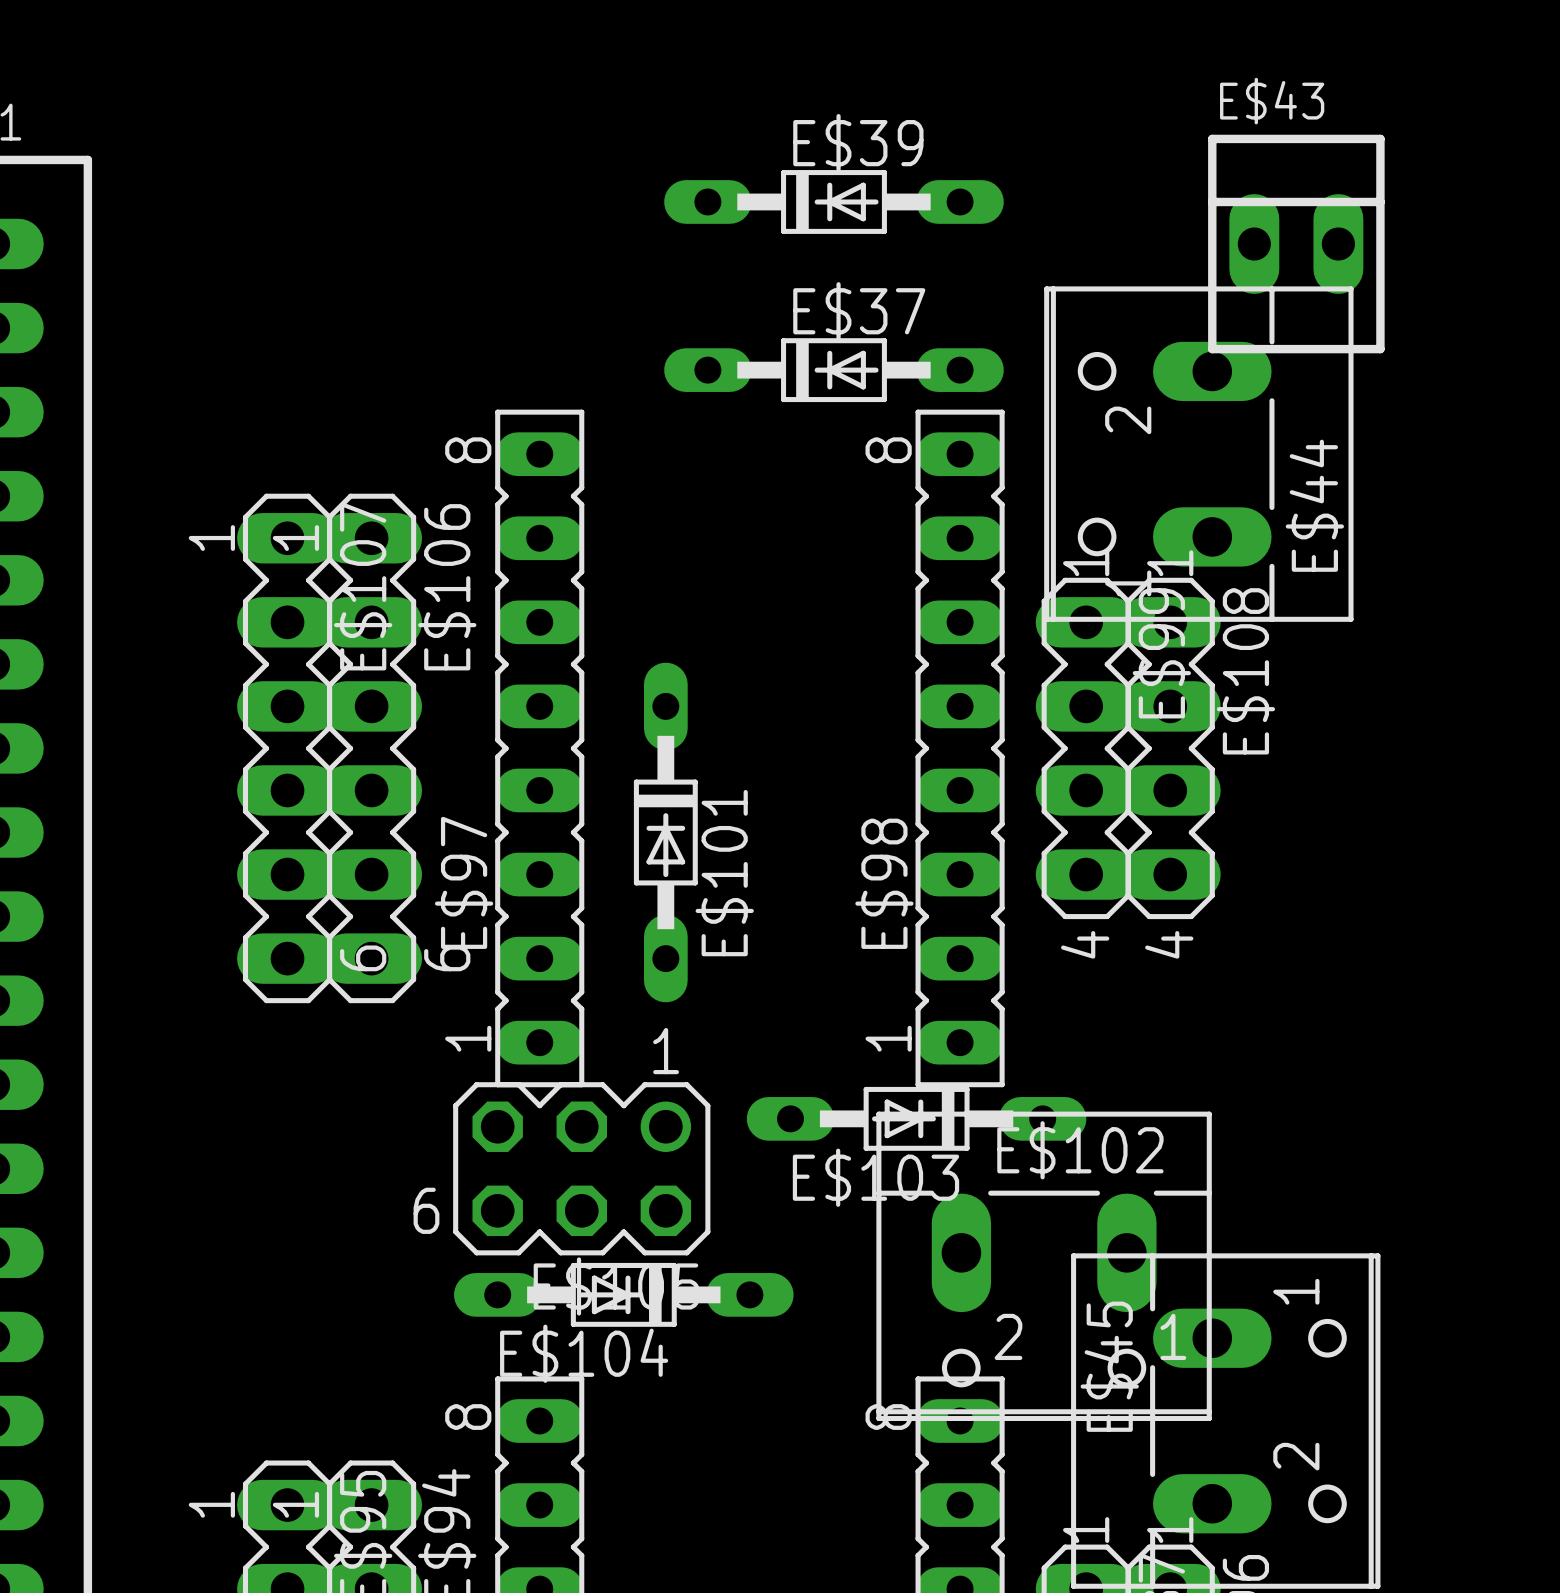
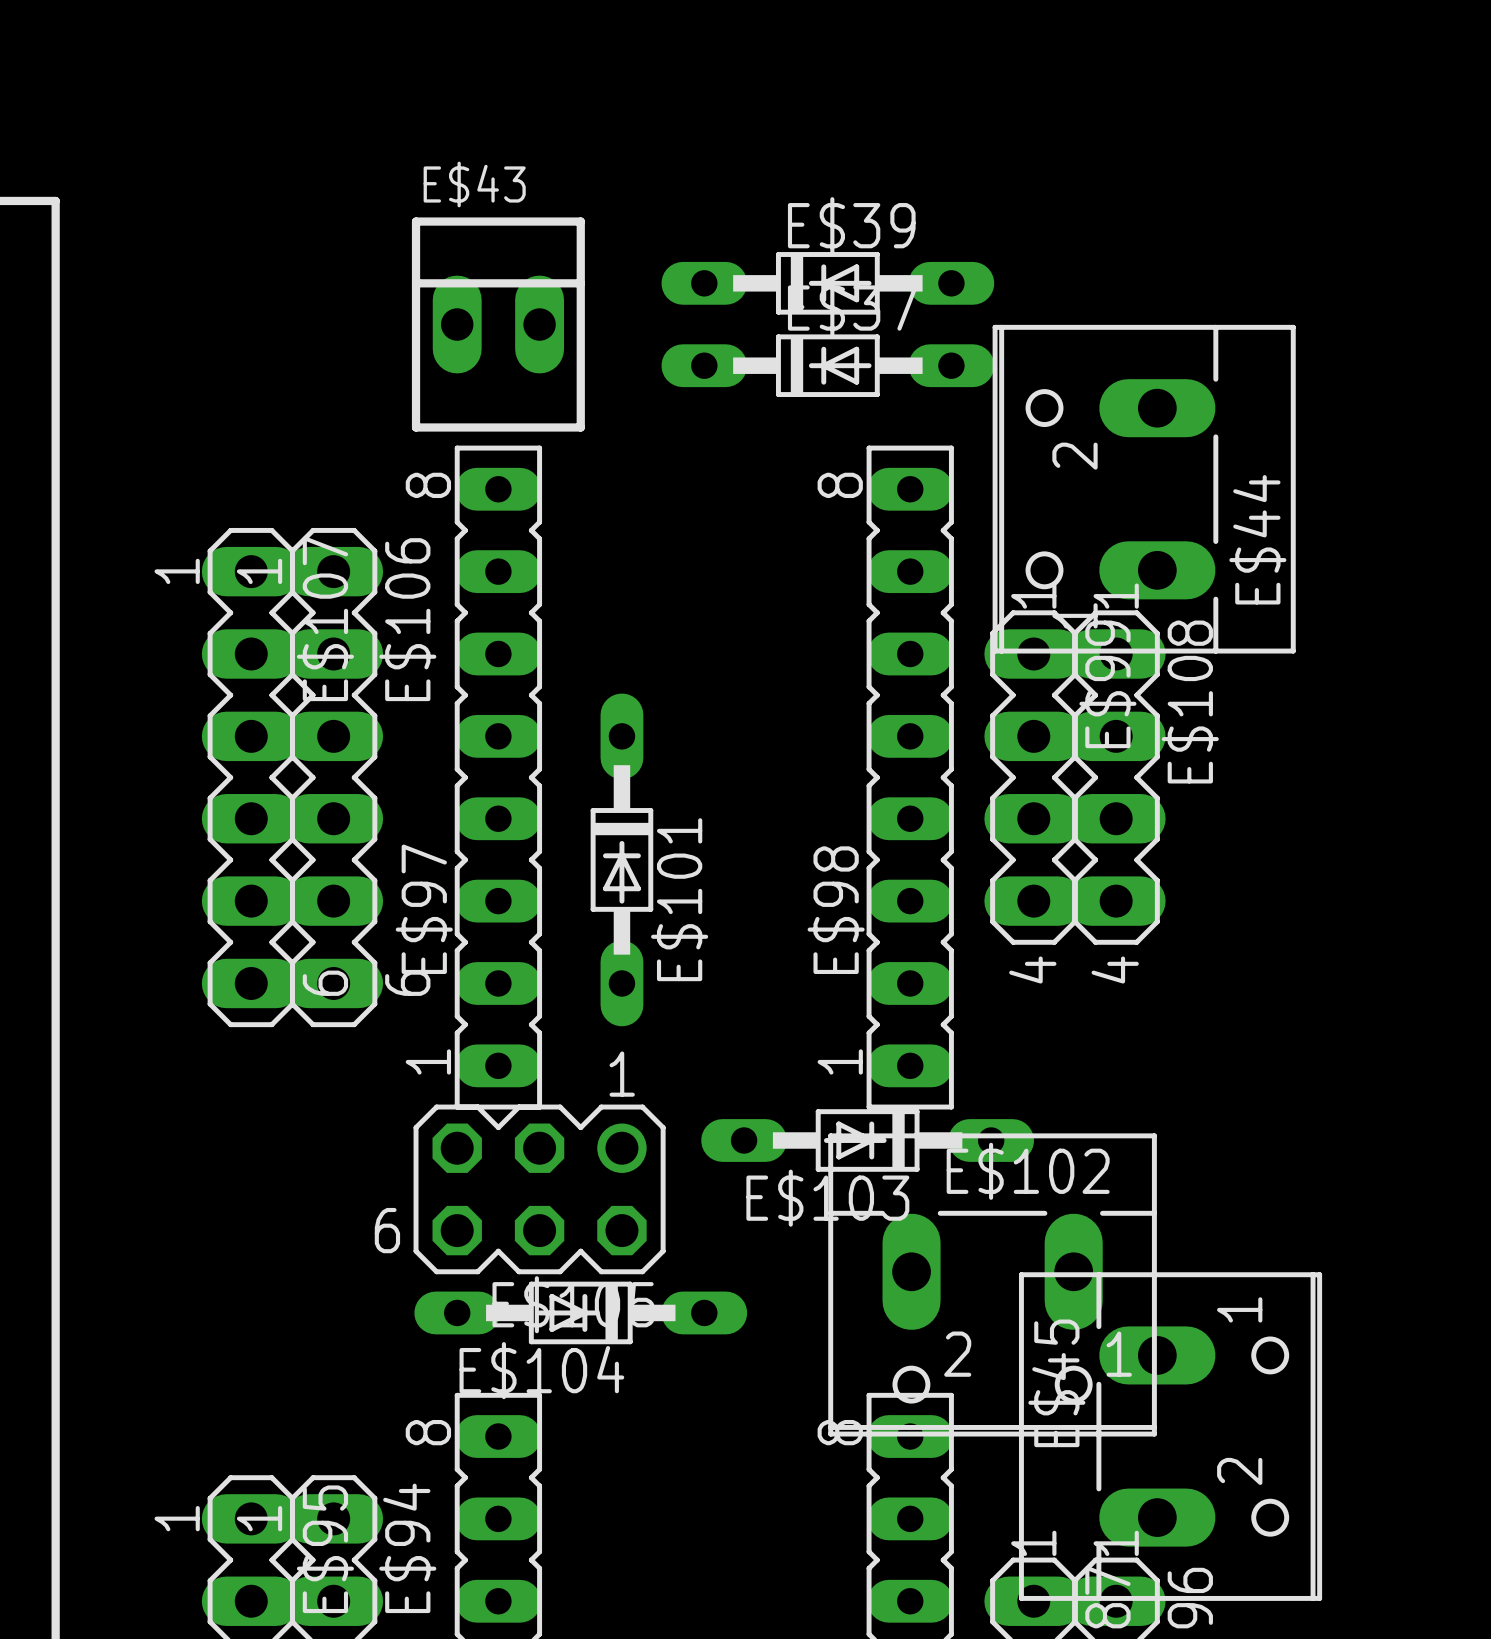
E$39 position: (833, 201) -> (827, 283)
E$43 position: (1296, 244) -> (498, 324)
E$37 position: (833, 370) -> (827, 365)

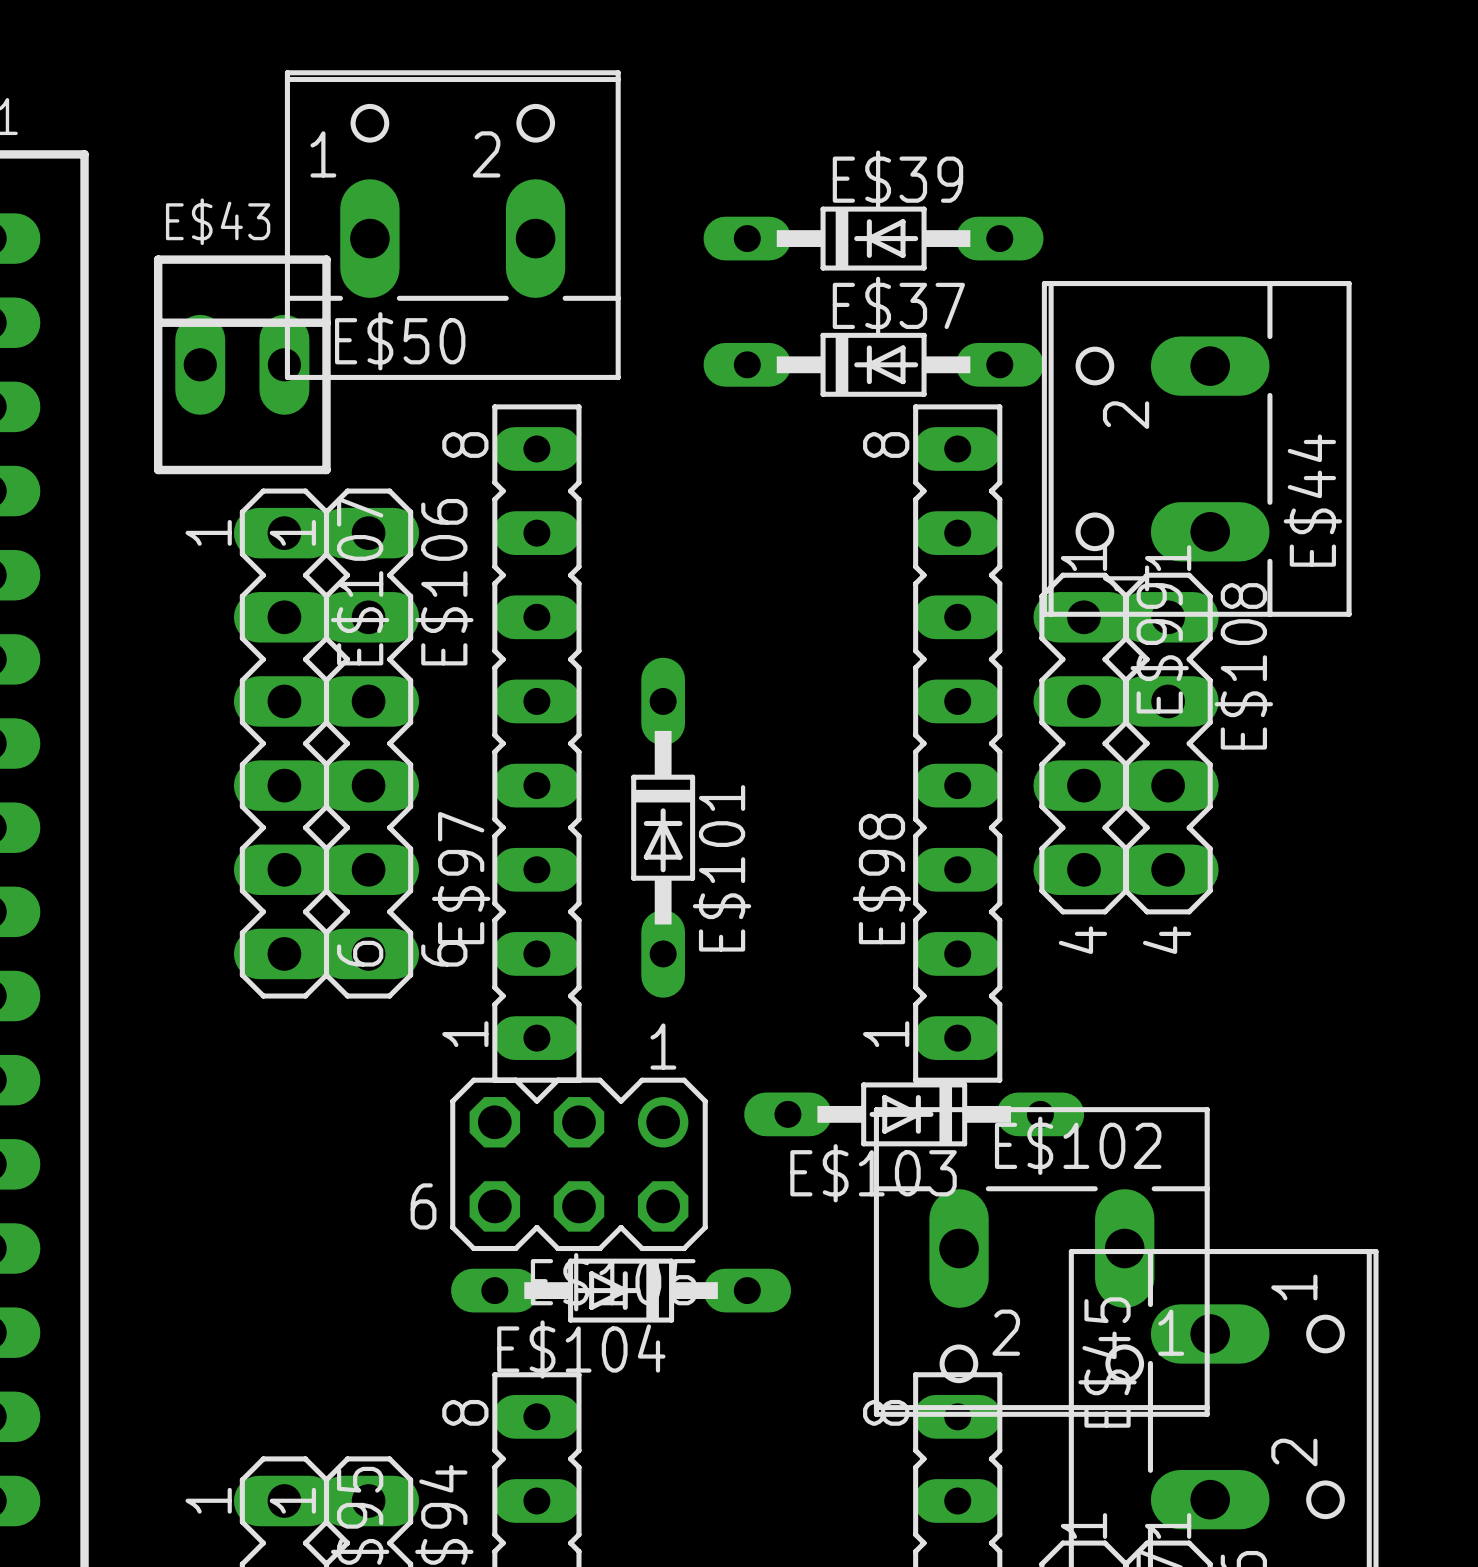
E$50: none -> (452, 225)
E$43 position: (498, 324) -> (242, 364)
E$37 position: (827, 365) -> (873, 364)

